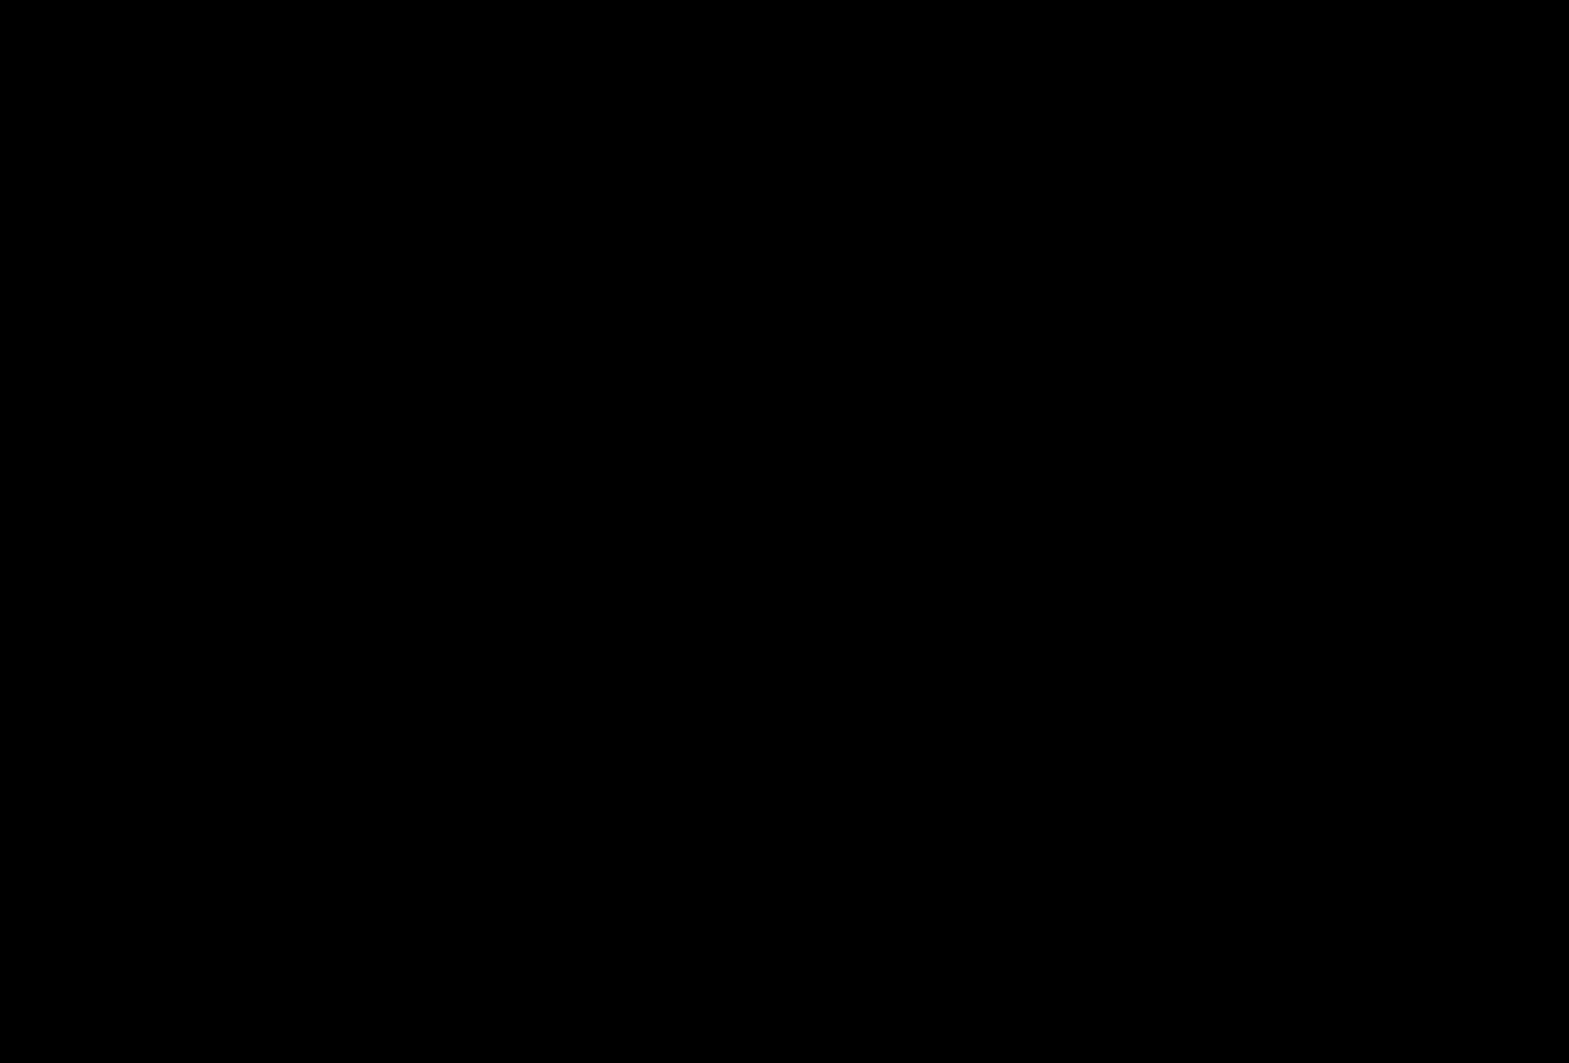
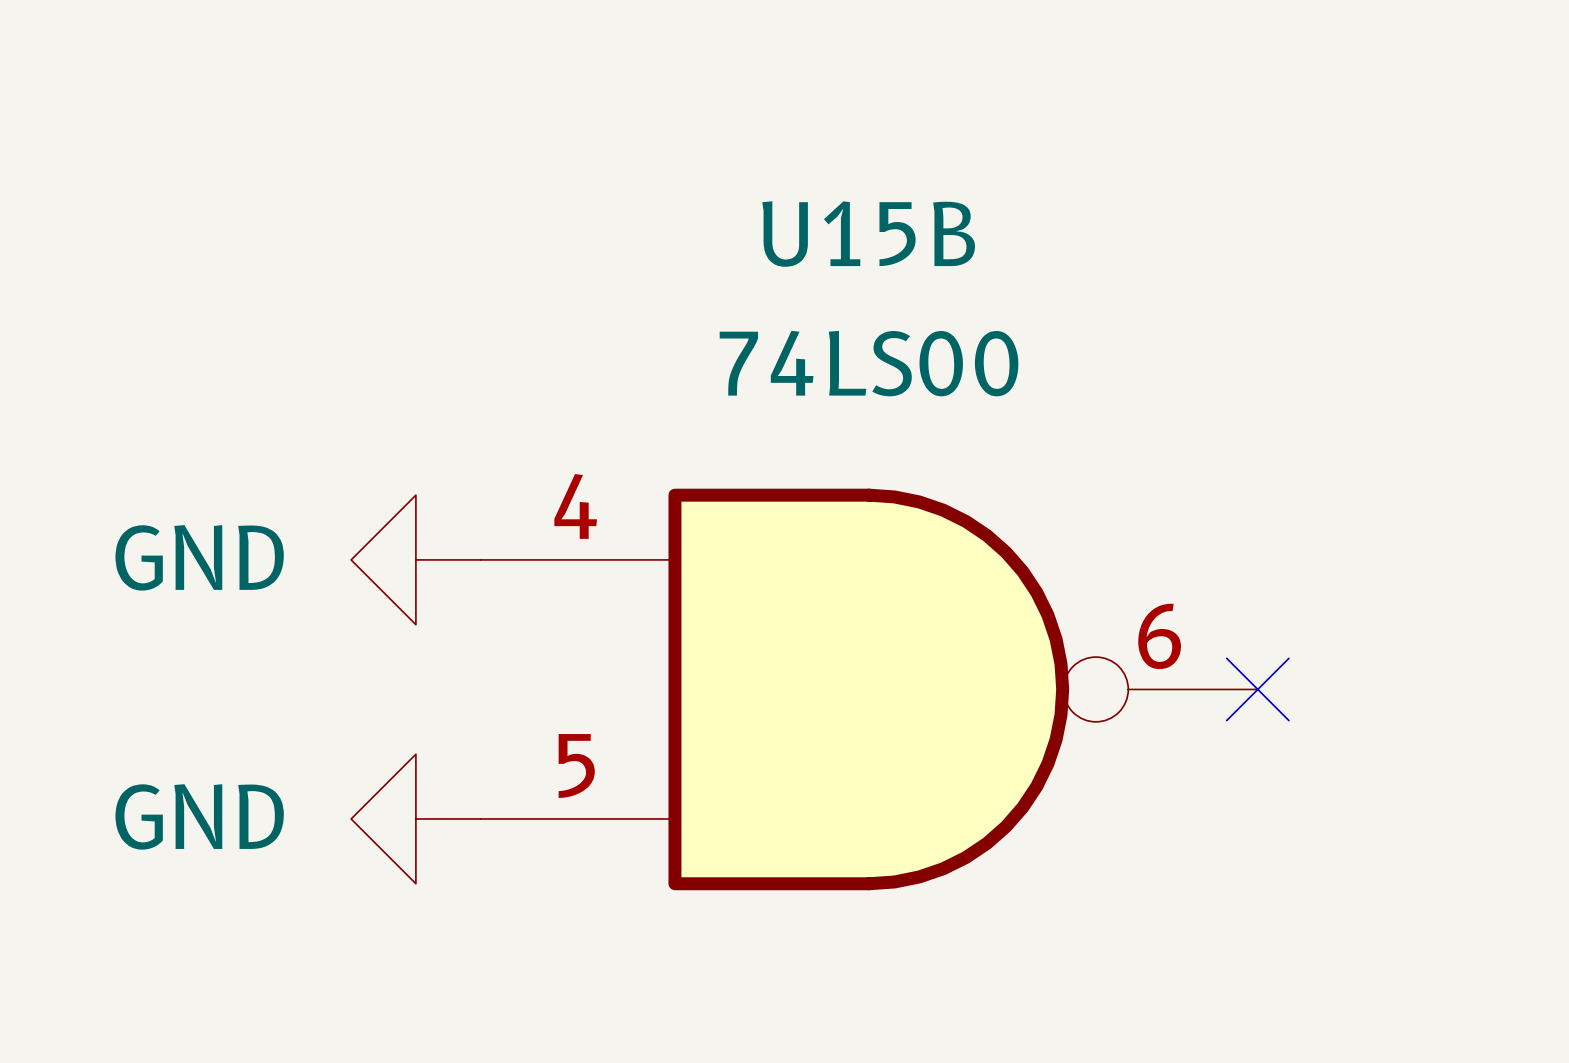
power symbol: none -> GND (415, 559)
U15B: none -> 74LS00 (869, 689)
no-connect mark: none -> (1257, 689)
power symbol: none -> GND (415, 818)

